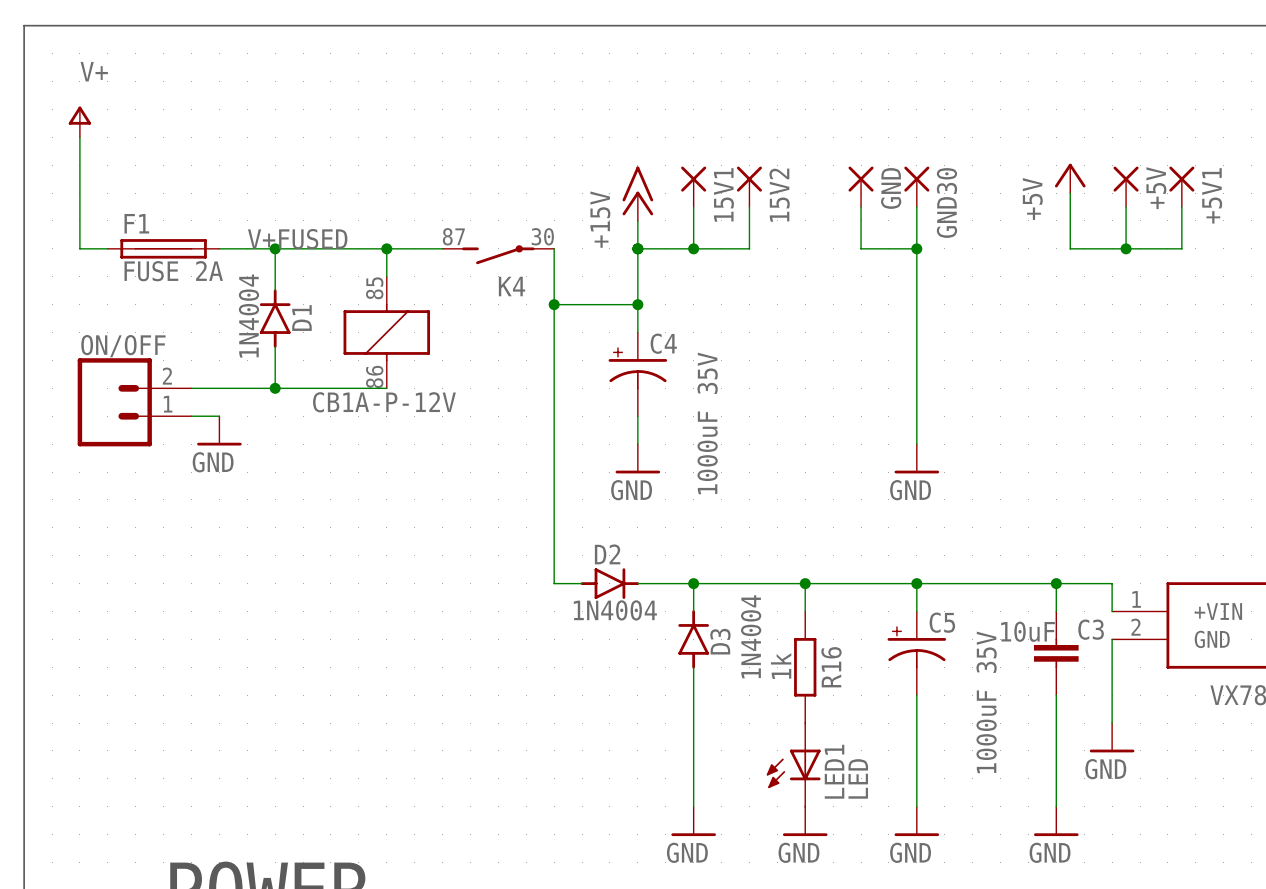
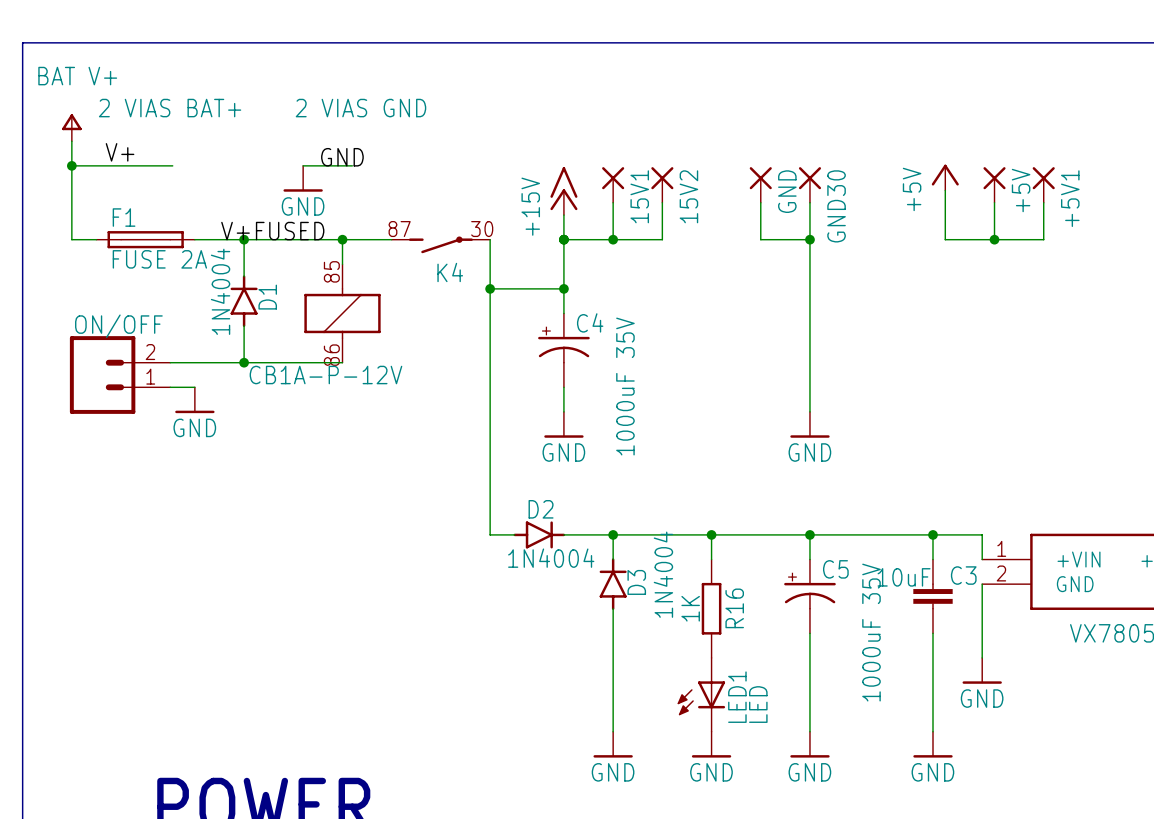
power symbol text: none -> BAT V+ (77, 76)
label position: V+ (94, 71) -> V+ (120, 152)
text: none -> 2 VIAS BAT+ (170, 108)
text: none -> 2 VIAS GND (361, 108)
label: none -> GND (342, 157)
wire: none -> (71, 165) (172, 165)
junction: none -> (71, 165)
wire: none -> (303, 165) (352, 165)
power symbol: none -> GND (303, 178)
R16 value: 1k (781, 666) -> 1K (690, 608)

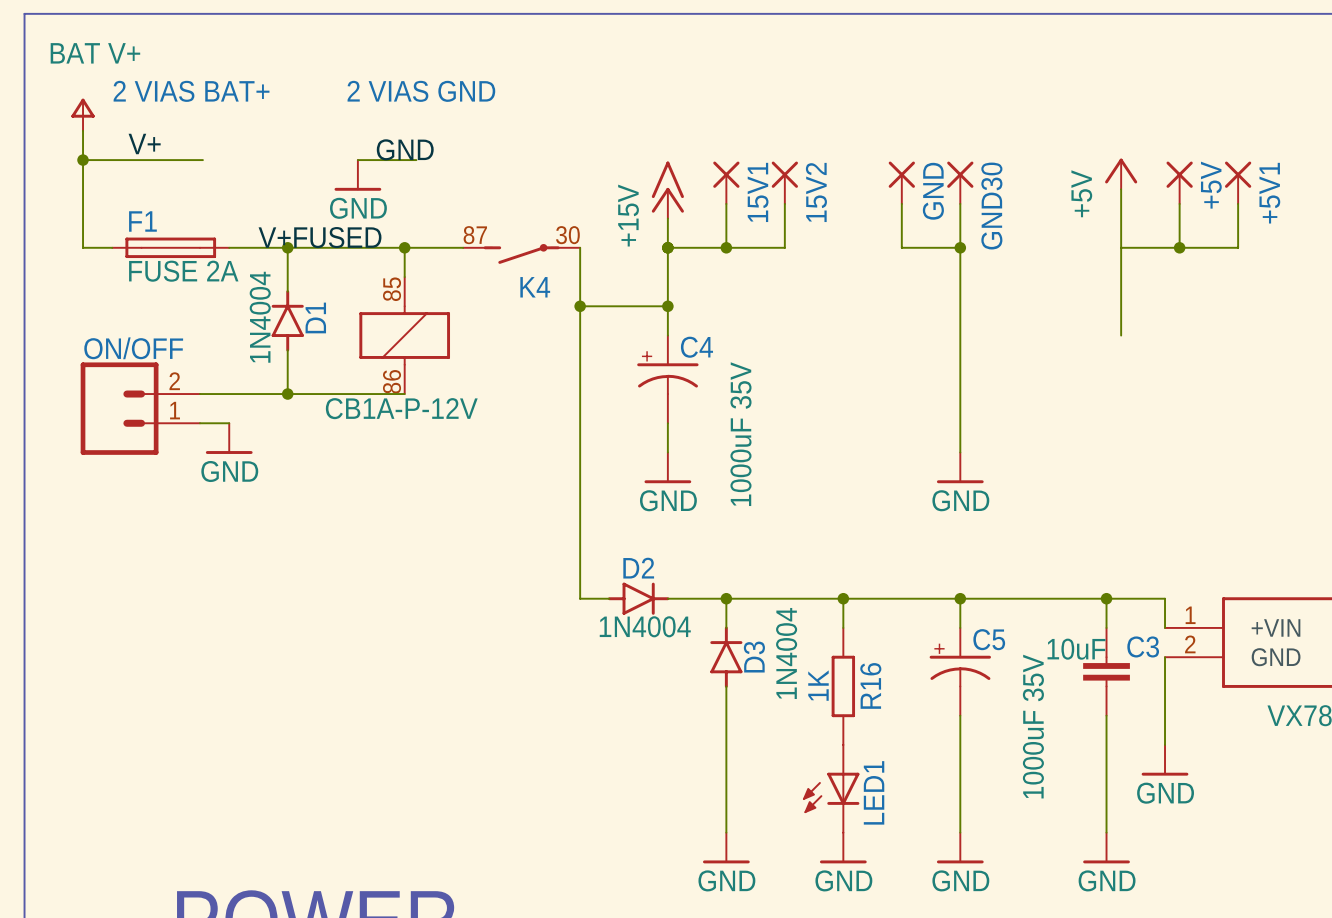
wire: none -> (1121, 247) (1121, 335)
LED1 value: LED (758, 704) -> none

